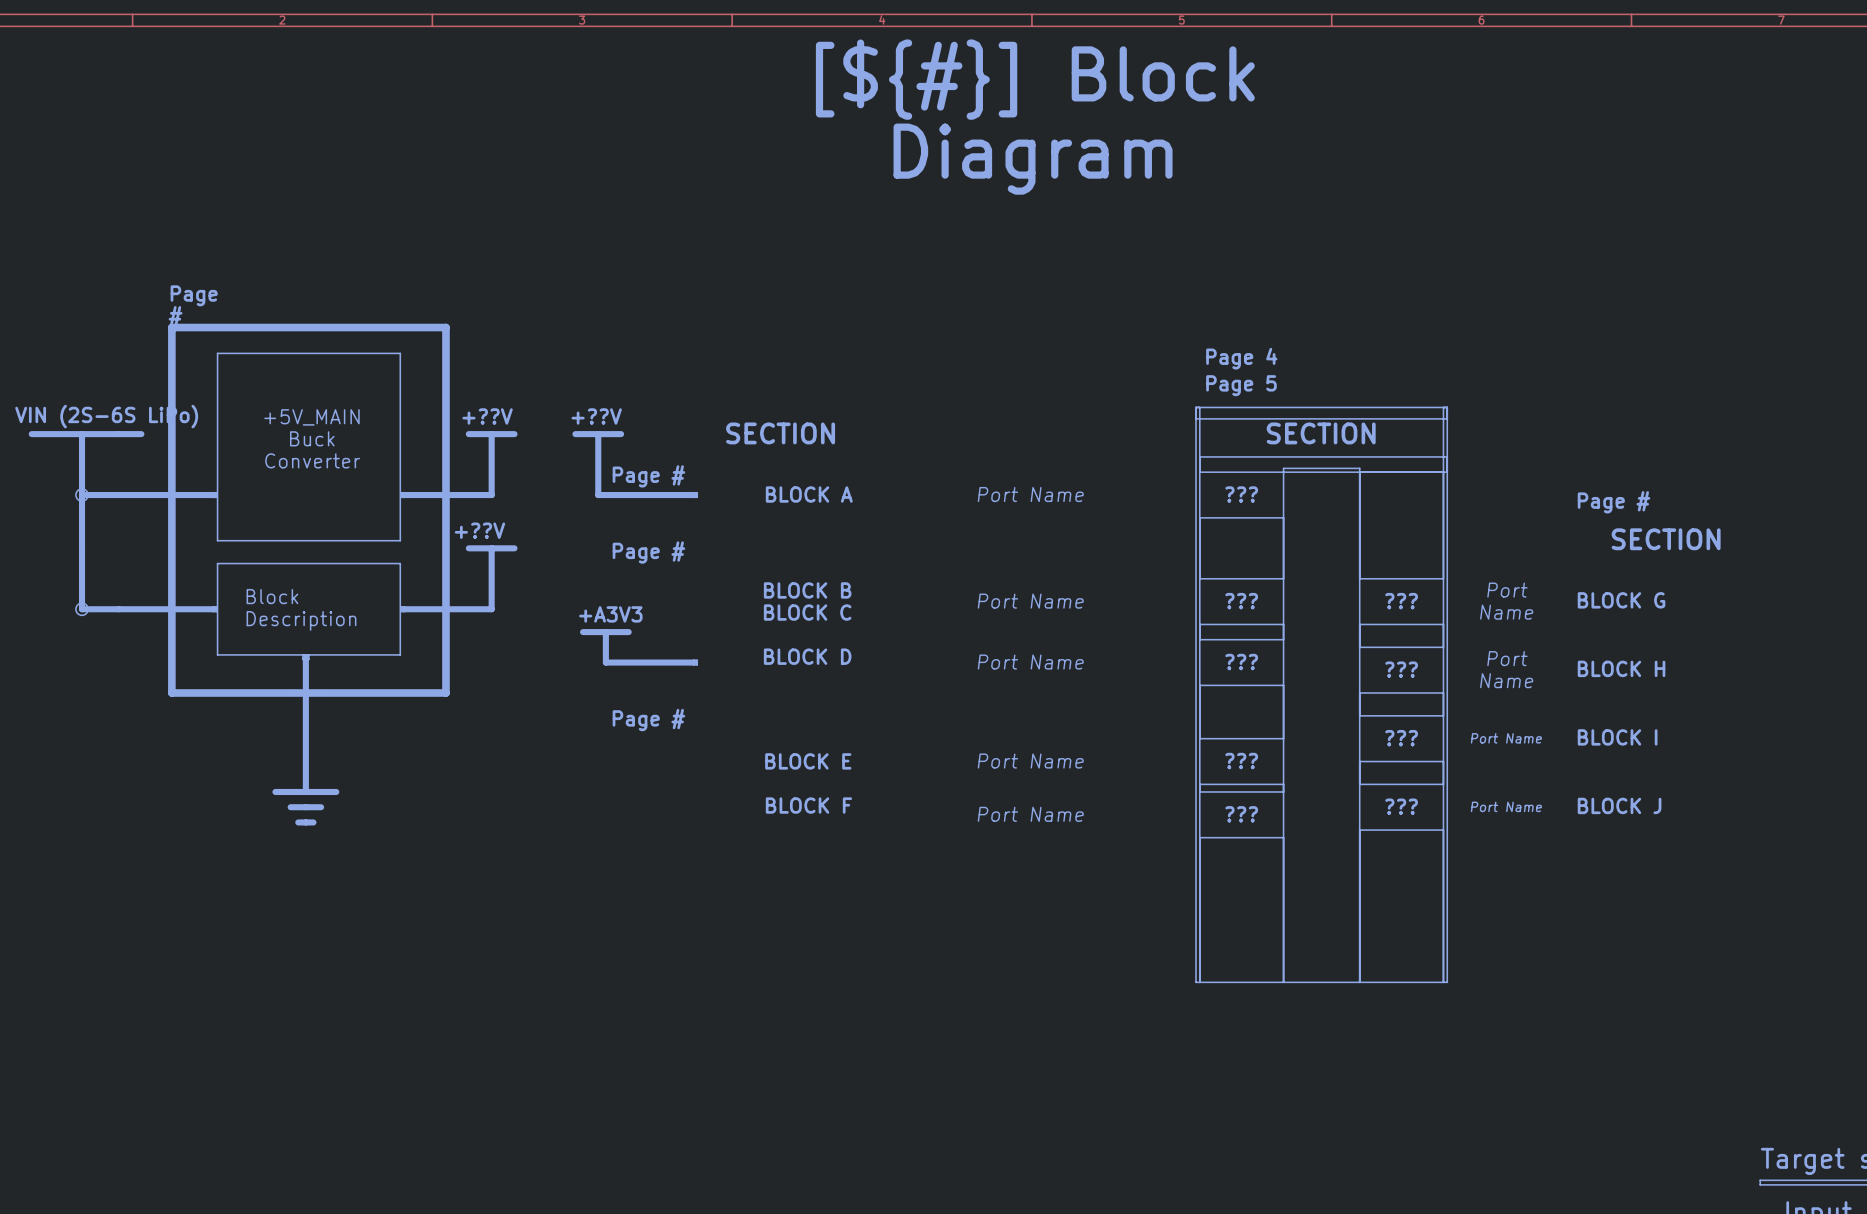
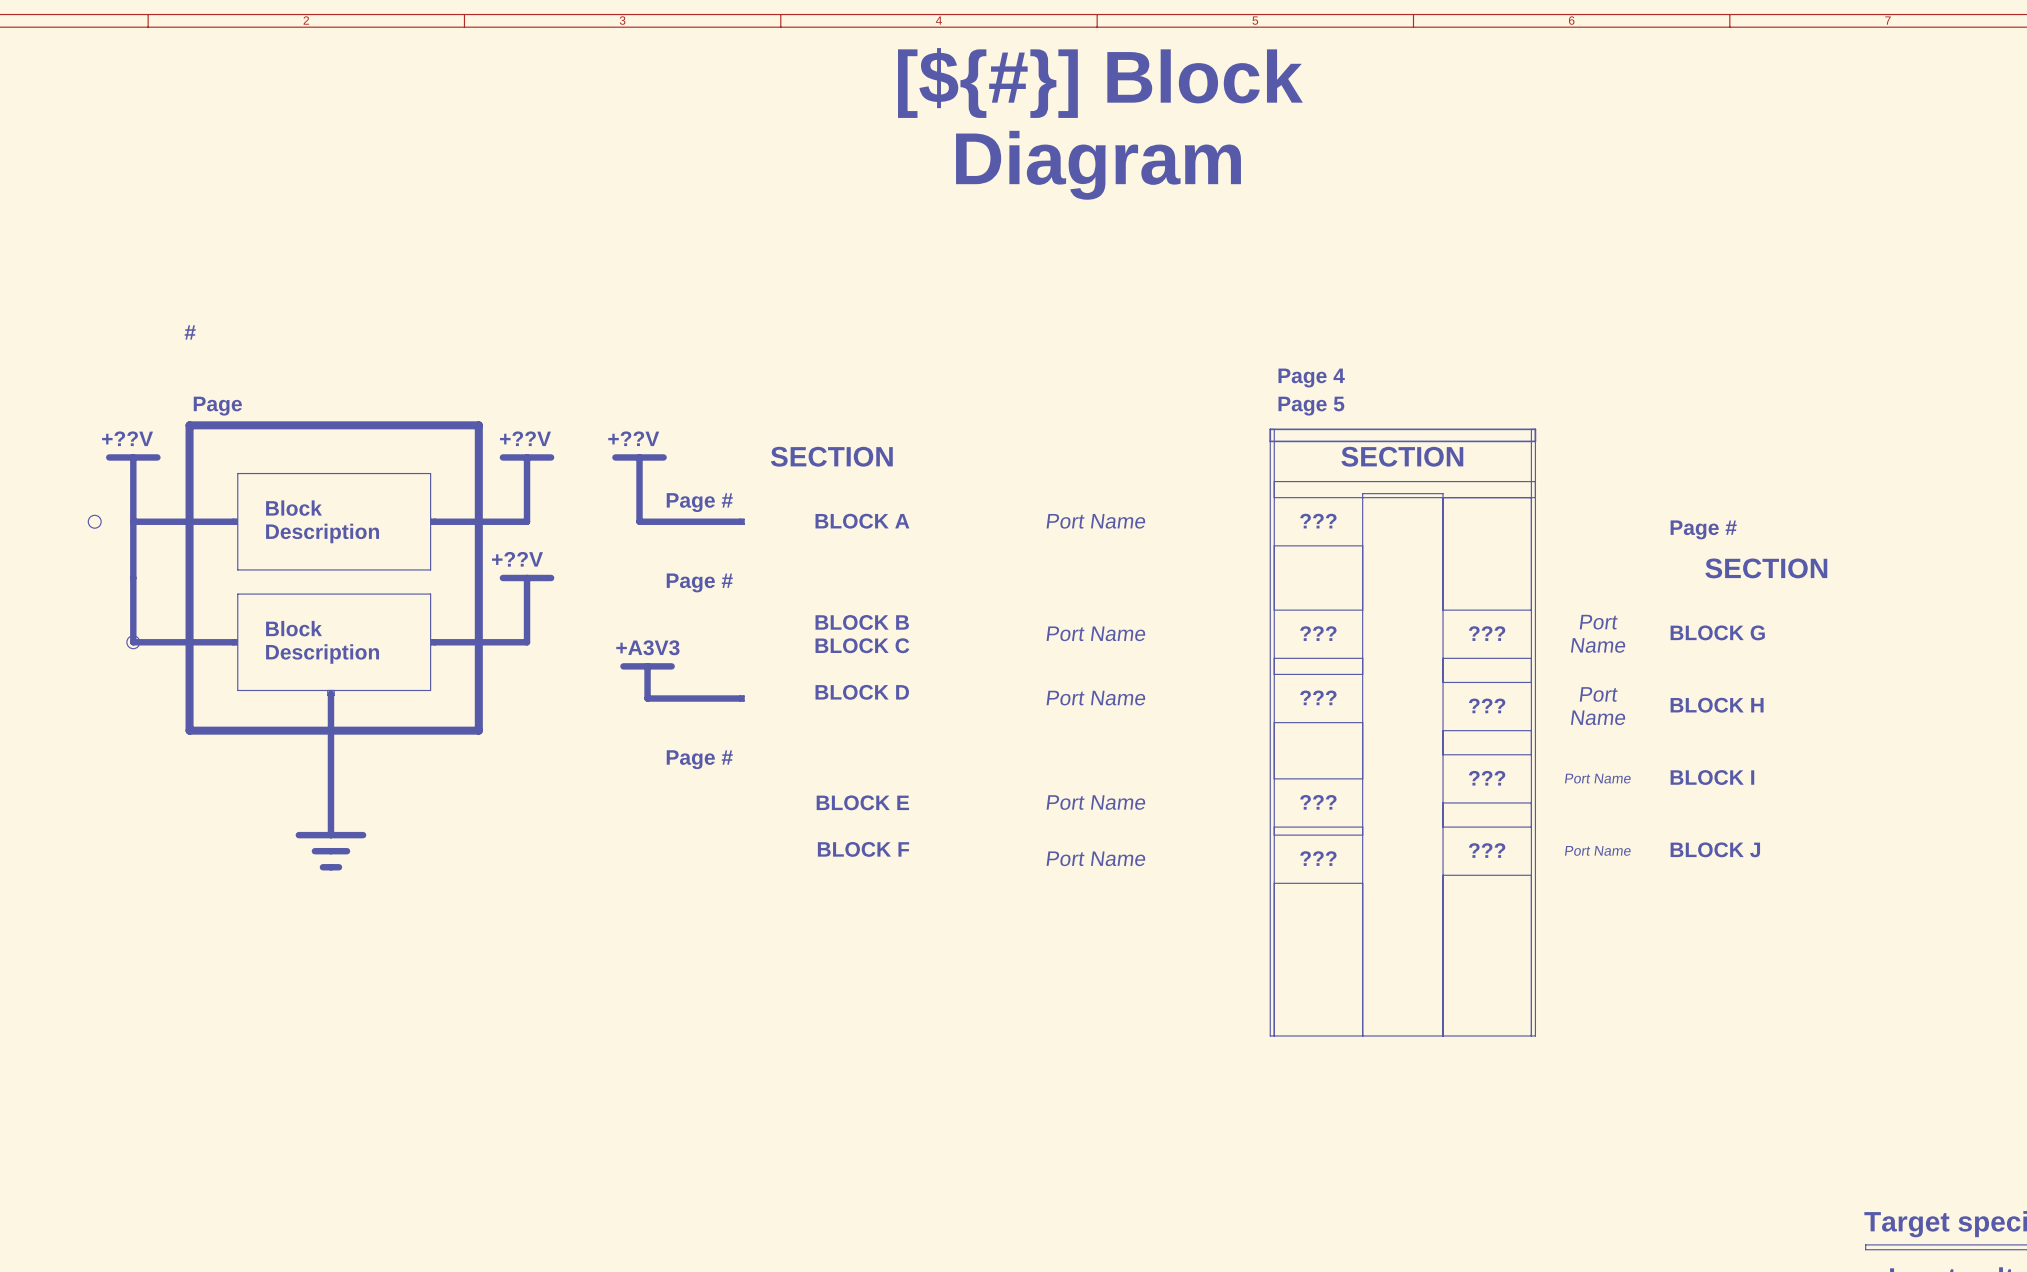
text position: Page (194, 295) -> Page (217, 406)
line: (171, 403) (171, 327) (445, 327) (445, 403) -> (189, 425) (478, 425)
text: VIN (2S-6S LiPo) (106, 416) -> none
text: none -> +??V (127, 438)
text: +5V_MAIN (311, 417) -> none
line: (31, 434) (95, 434) -> none
line: (82, 434) (82, 609) (118, 609) -> (133, 457) (133, 642)
text: Buck (312, 438) -> none
line: (217, 449) (217, 353) (400, 353) (400, 449) -> (237, 473) (430, 473)
text: Converter (312, 460) -> none
text: none -> Block (294, 508)
line: (82, 495) (118, 495) -> none
text: none -> Description (322, 533)
drawing position: (82, 609) -> (133, 642)

